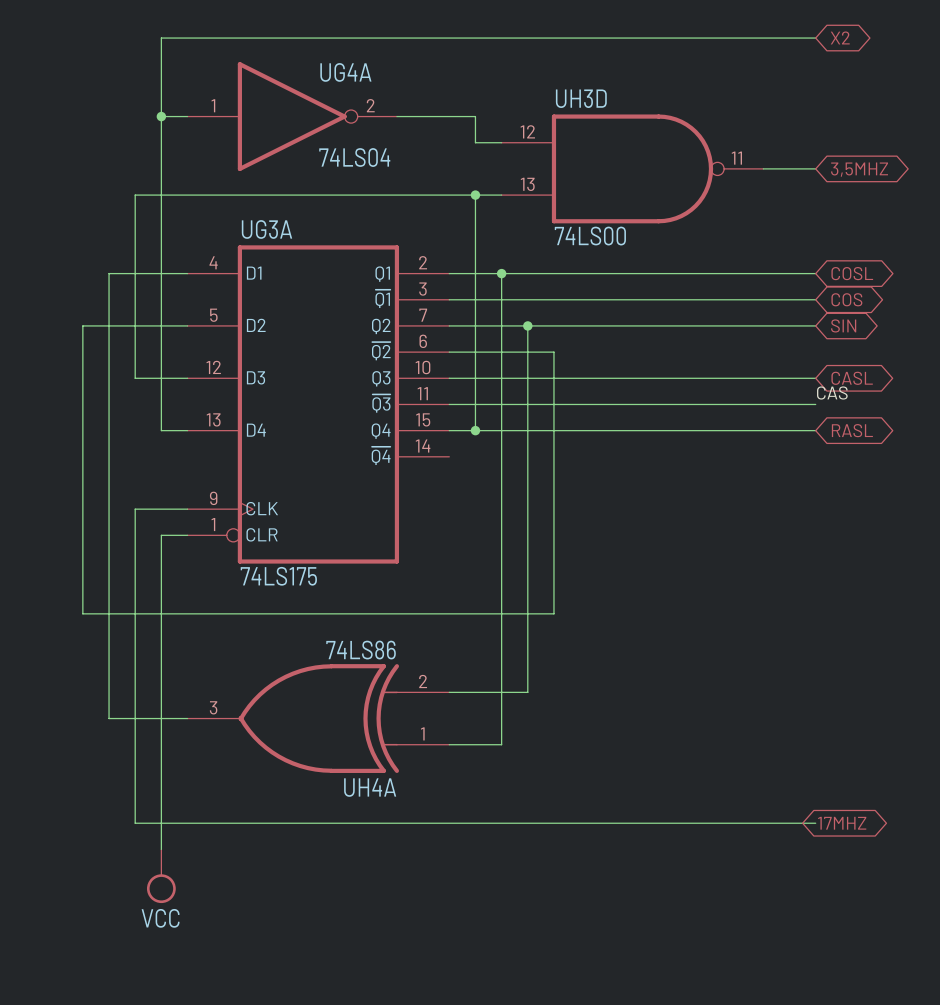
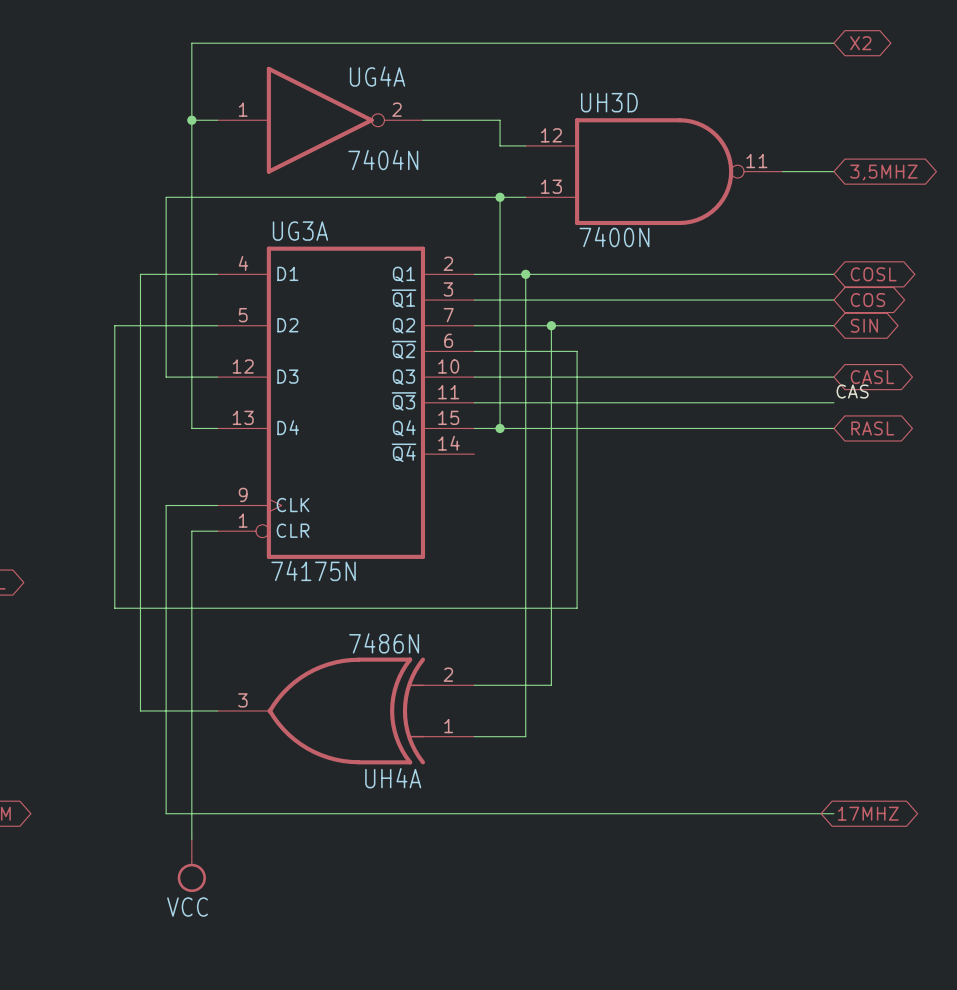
UG4A value: 74LS04 (354, 157) -> 7404N (383, 160)
UH3D value: 74LS00 (590, 236) -> 7400N (614, 237)
UG3A value: 74LS175 (278, 576) -> 74175N (313, 570)
UH4A value: 74LS86 (361, 650) -> 7486N (384, 643)

